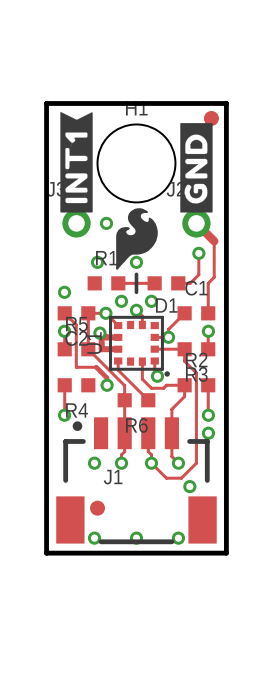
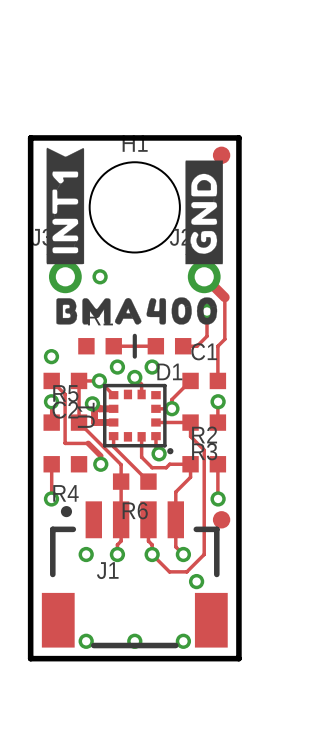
drawing shape: [116, 208, 158, 270] -> [56, 297, 218, 325]
via: (97, 262) -> none
via: (136, 262) -> none
via: (208, 433) -> none
part position: (97, 508) -> (221, 519)

